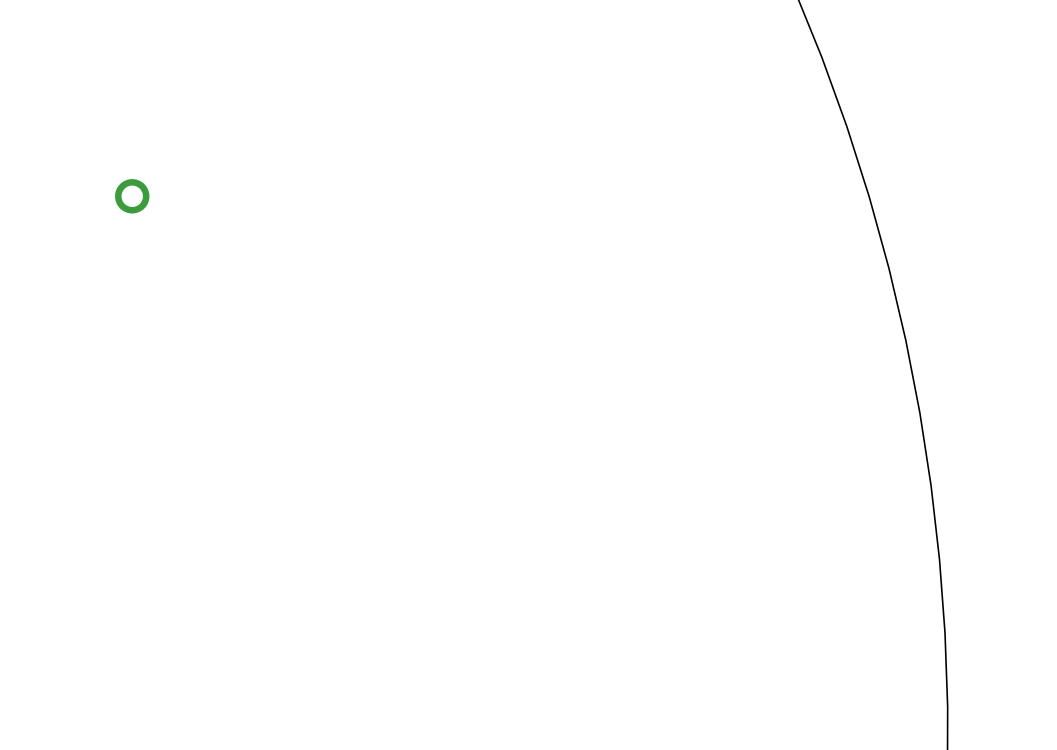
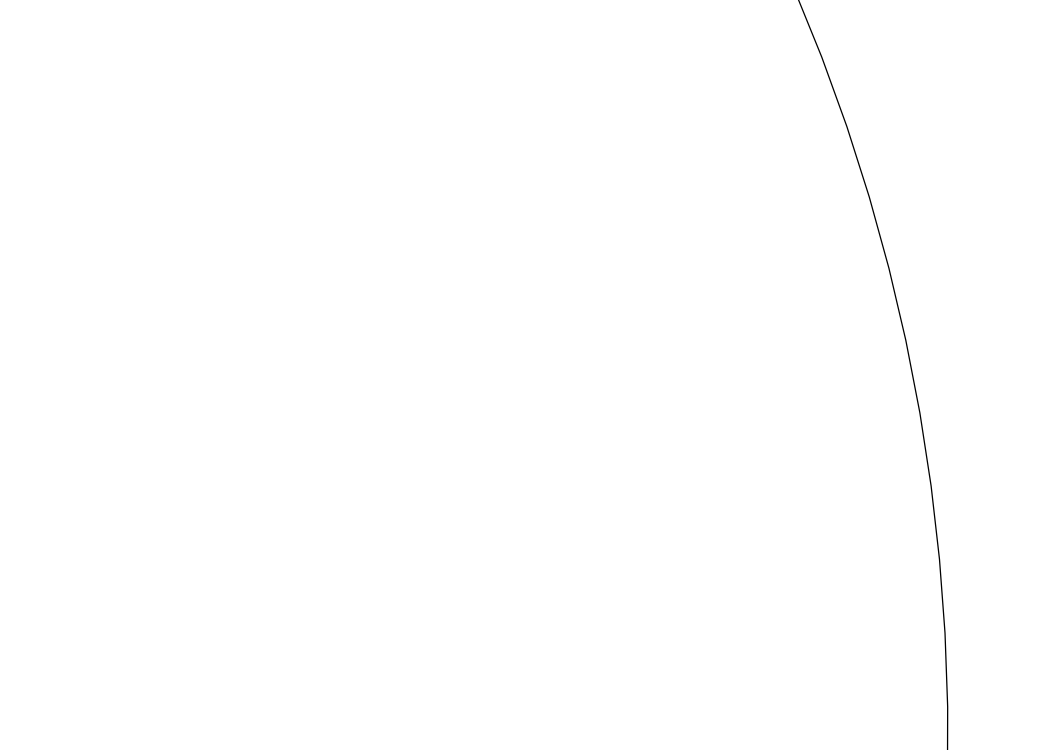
via: (132, 196) -> none

